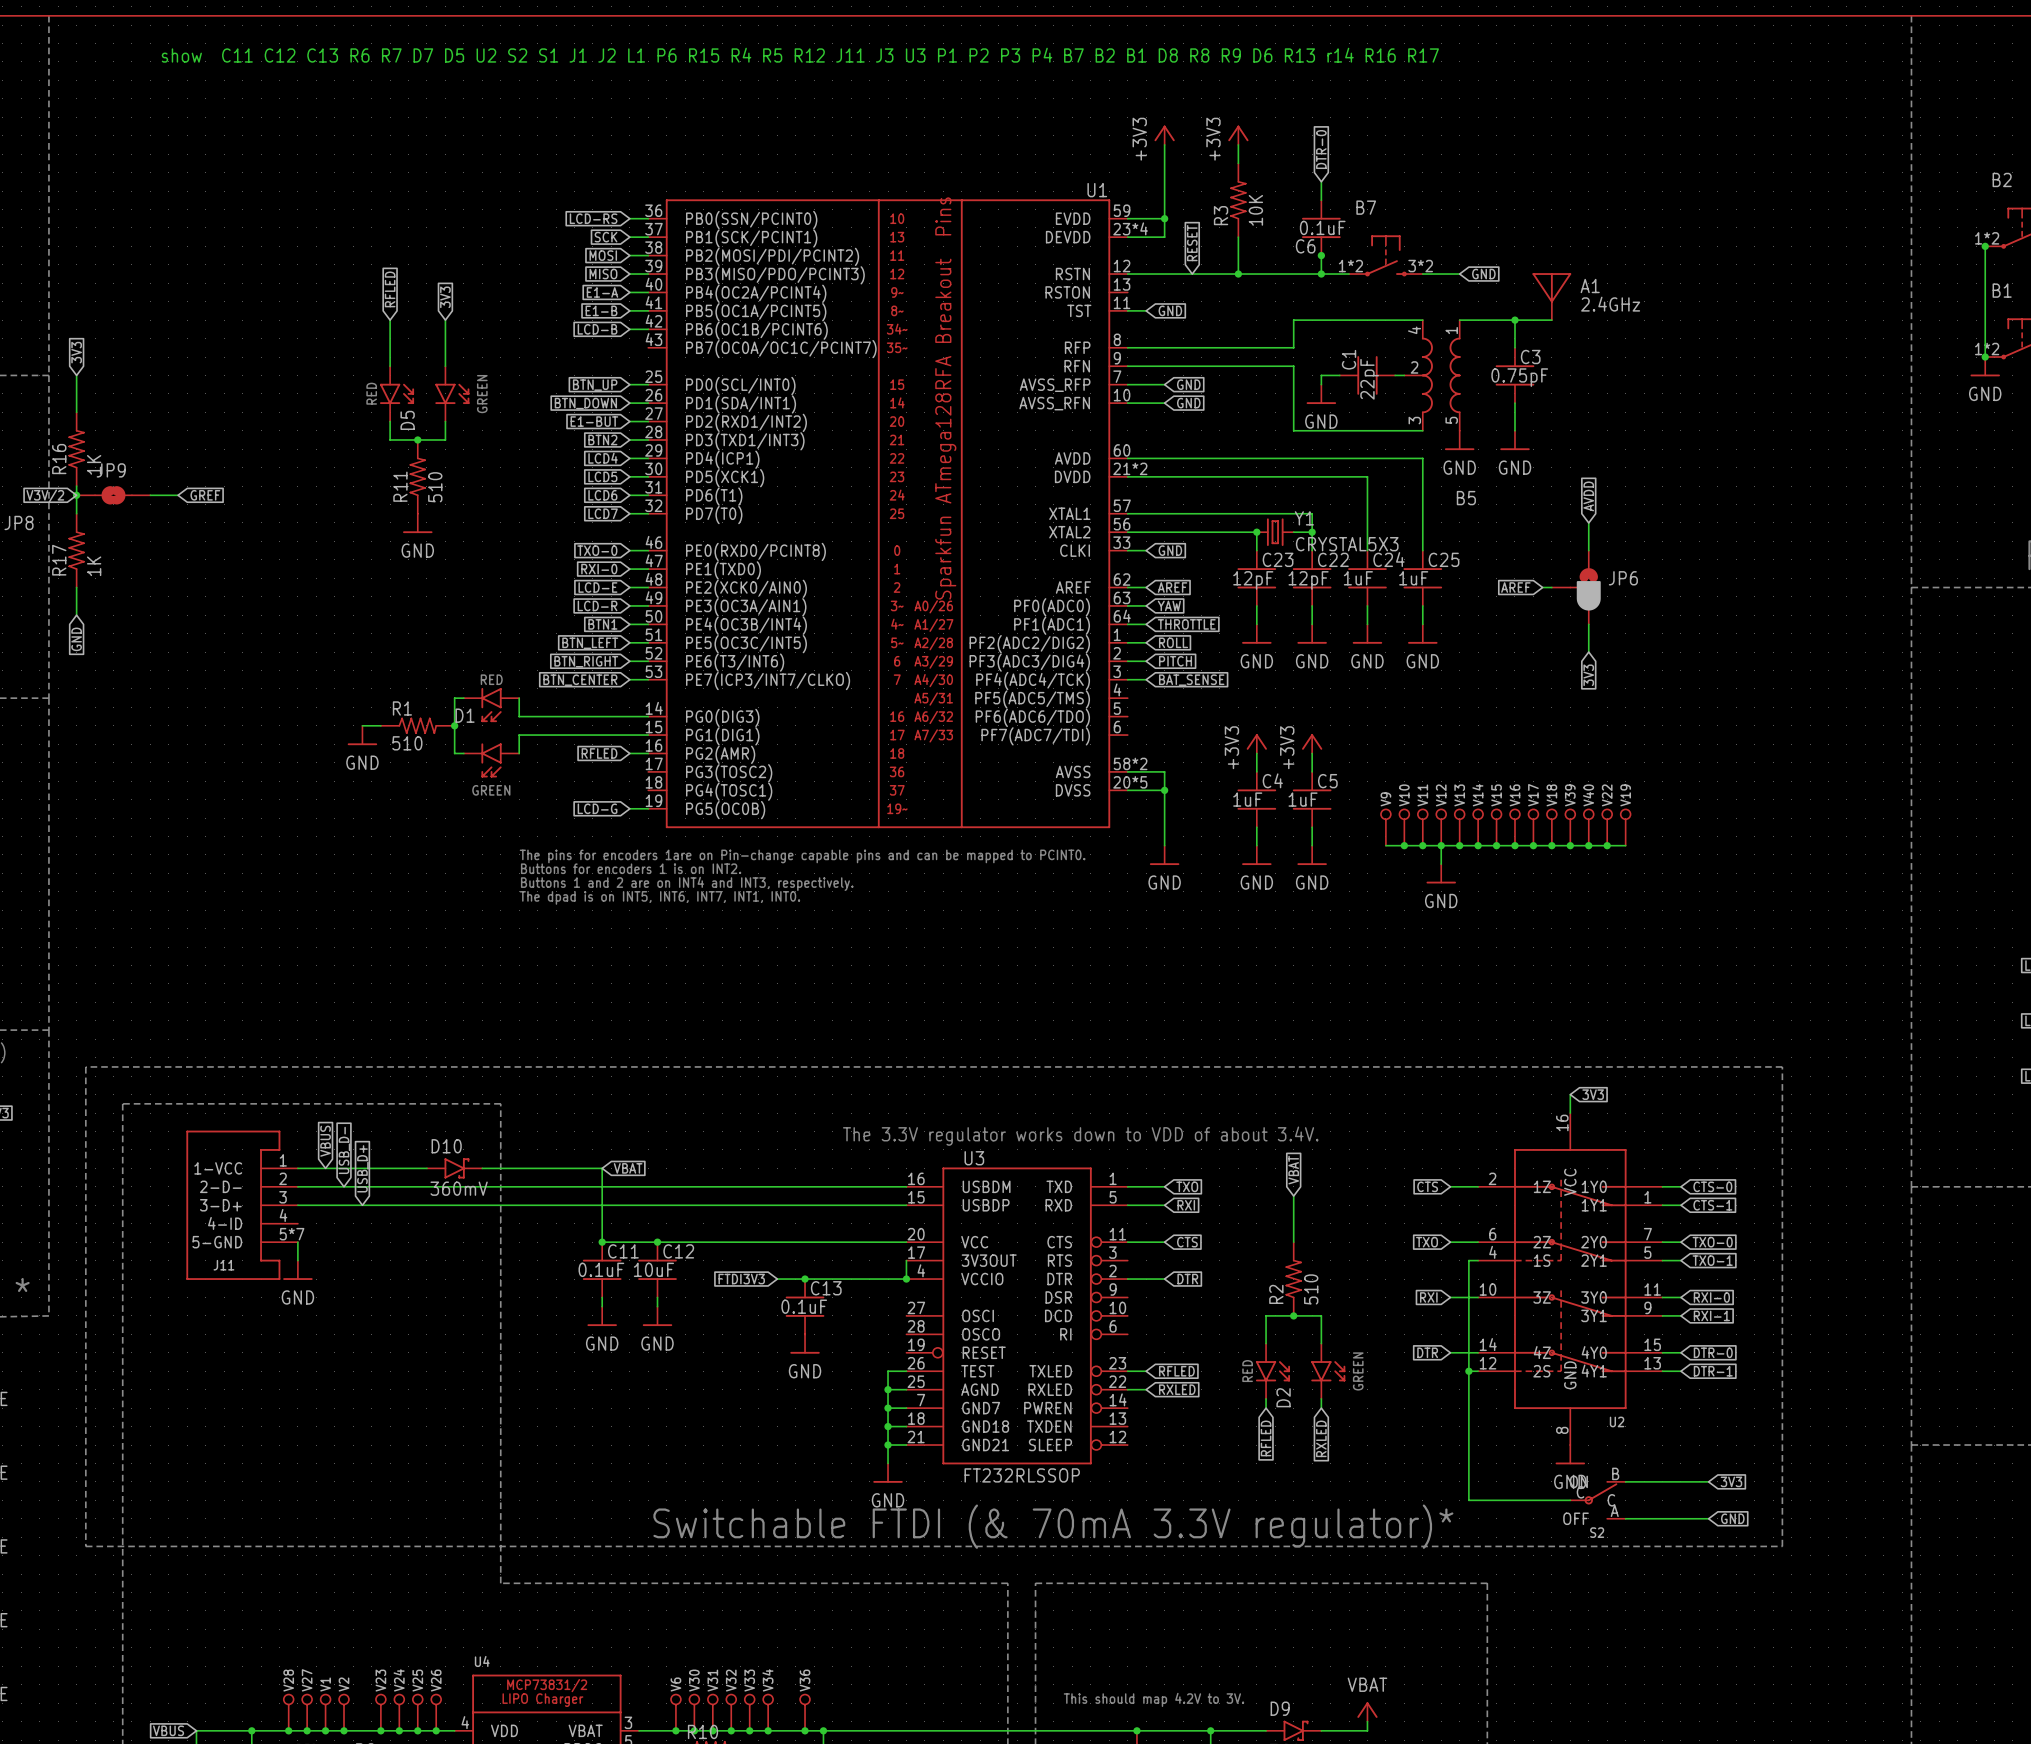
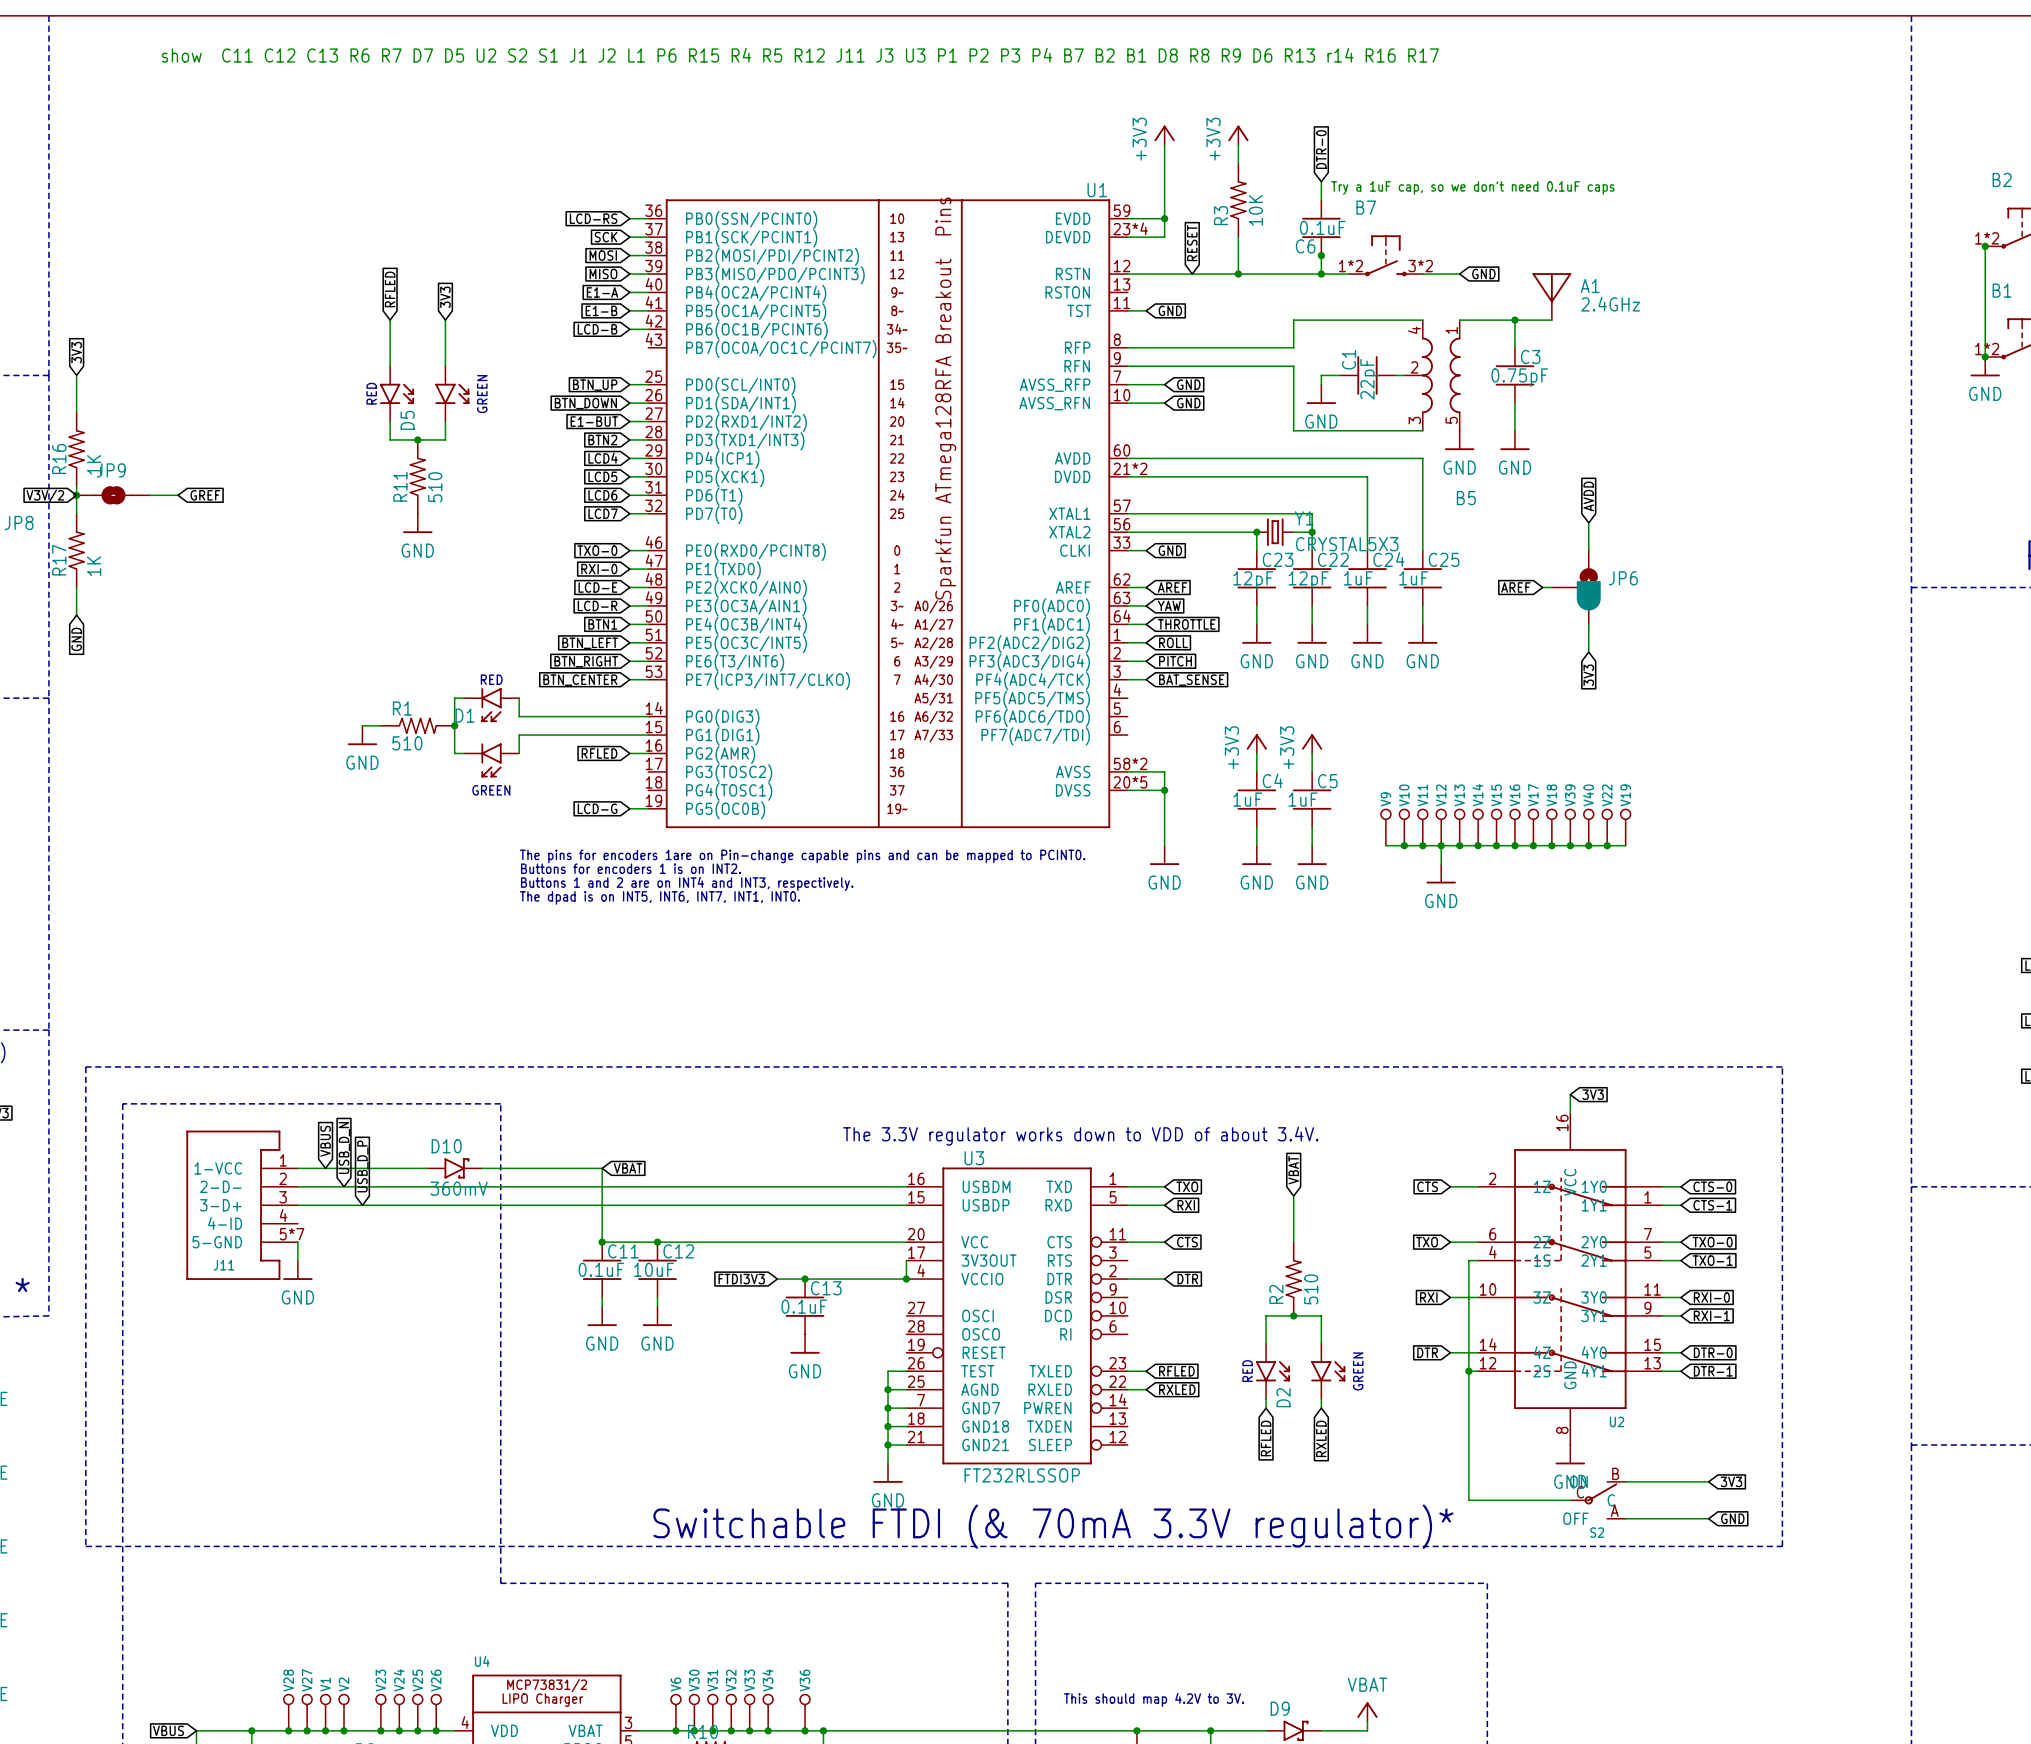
text: none -> Try a 1uF cap, so we don't need 0.1uF caps (1472, 187)
global label: USB_D- (344, 1150) -> USB_D_N (344, 1148)
global label: USB_D+ (362, 1168) -> USB_D_P (362, 1166)

